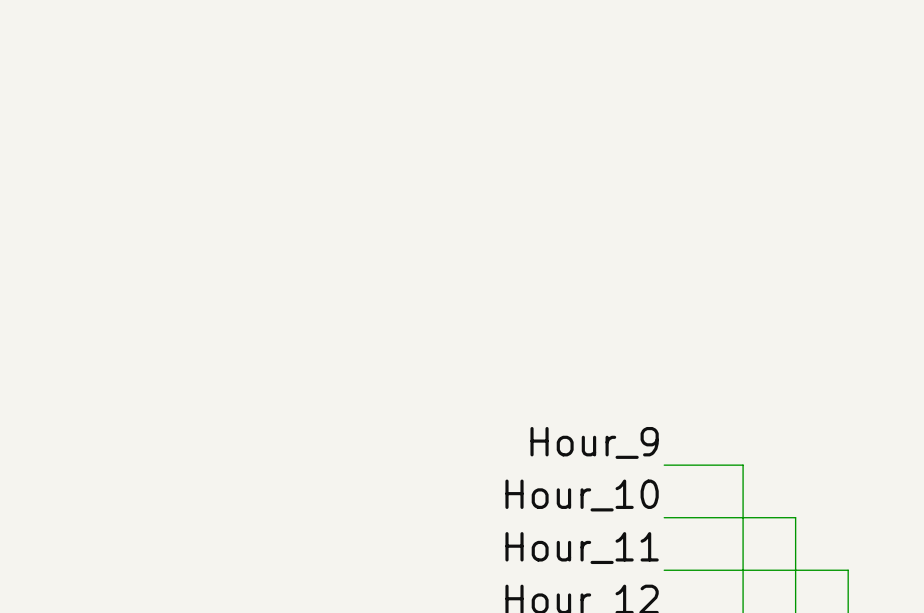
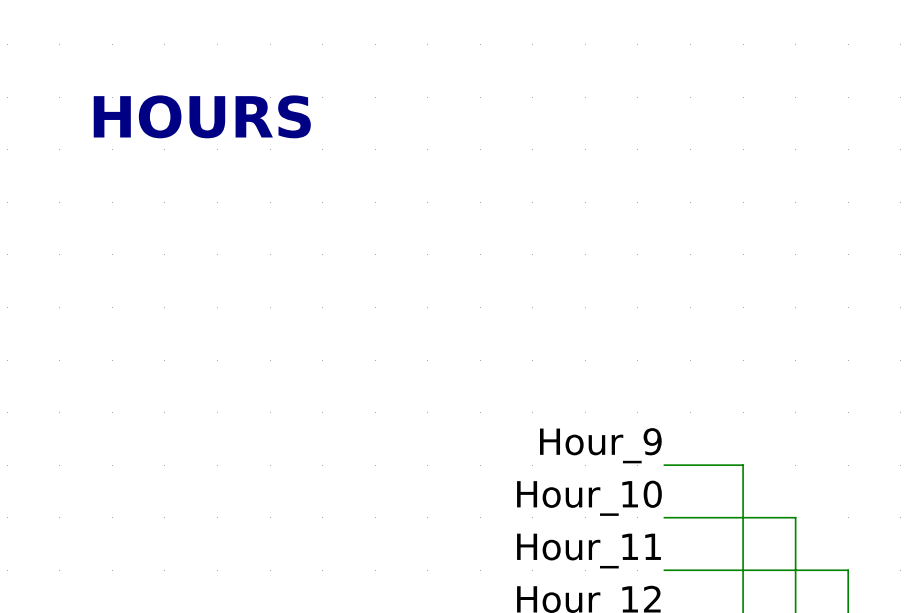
text: none -> HOURS (202, 116)

